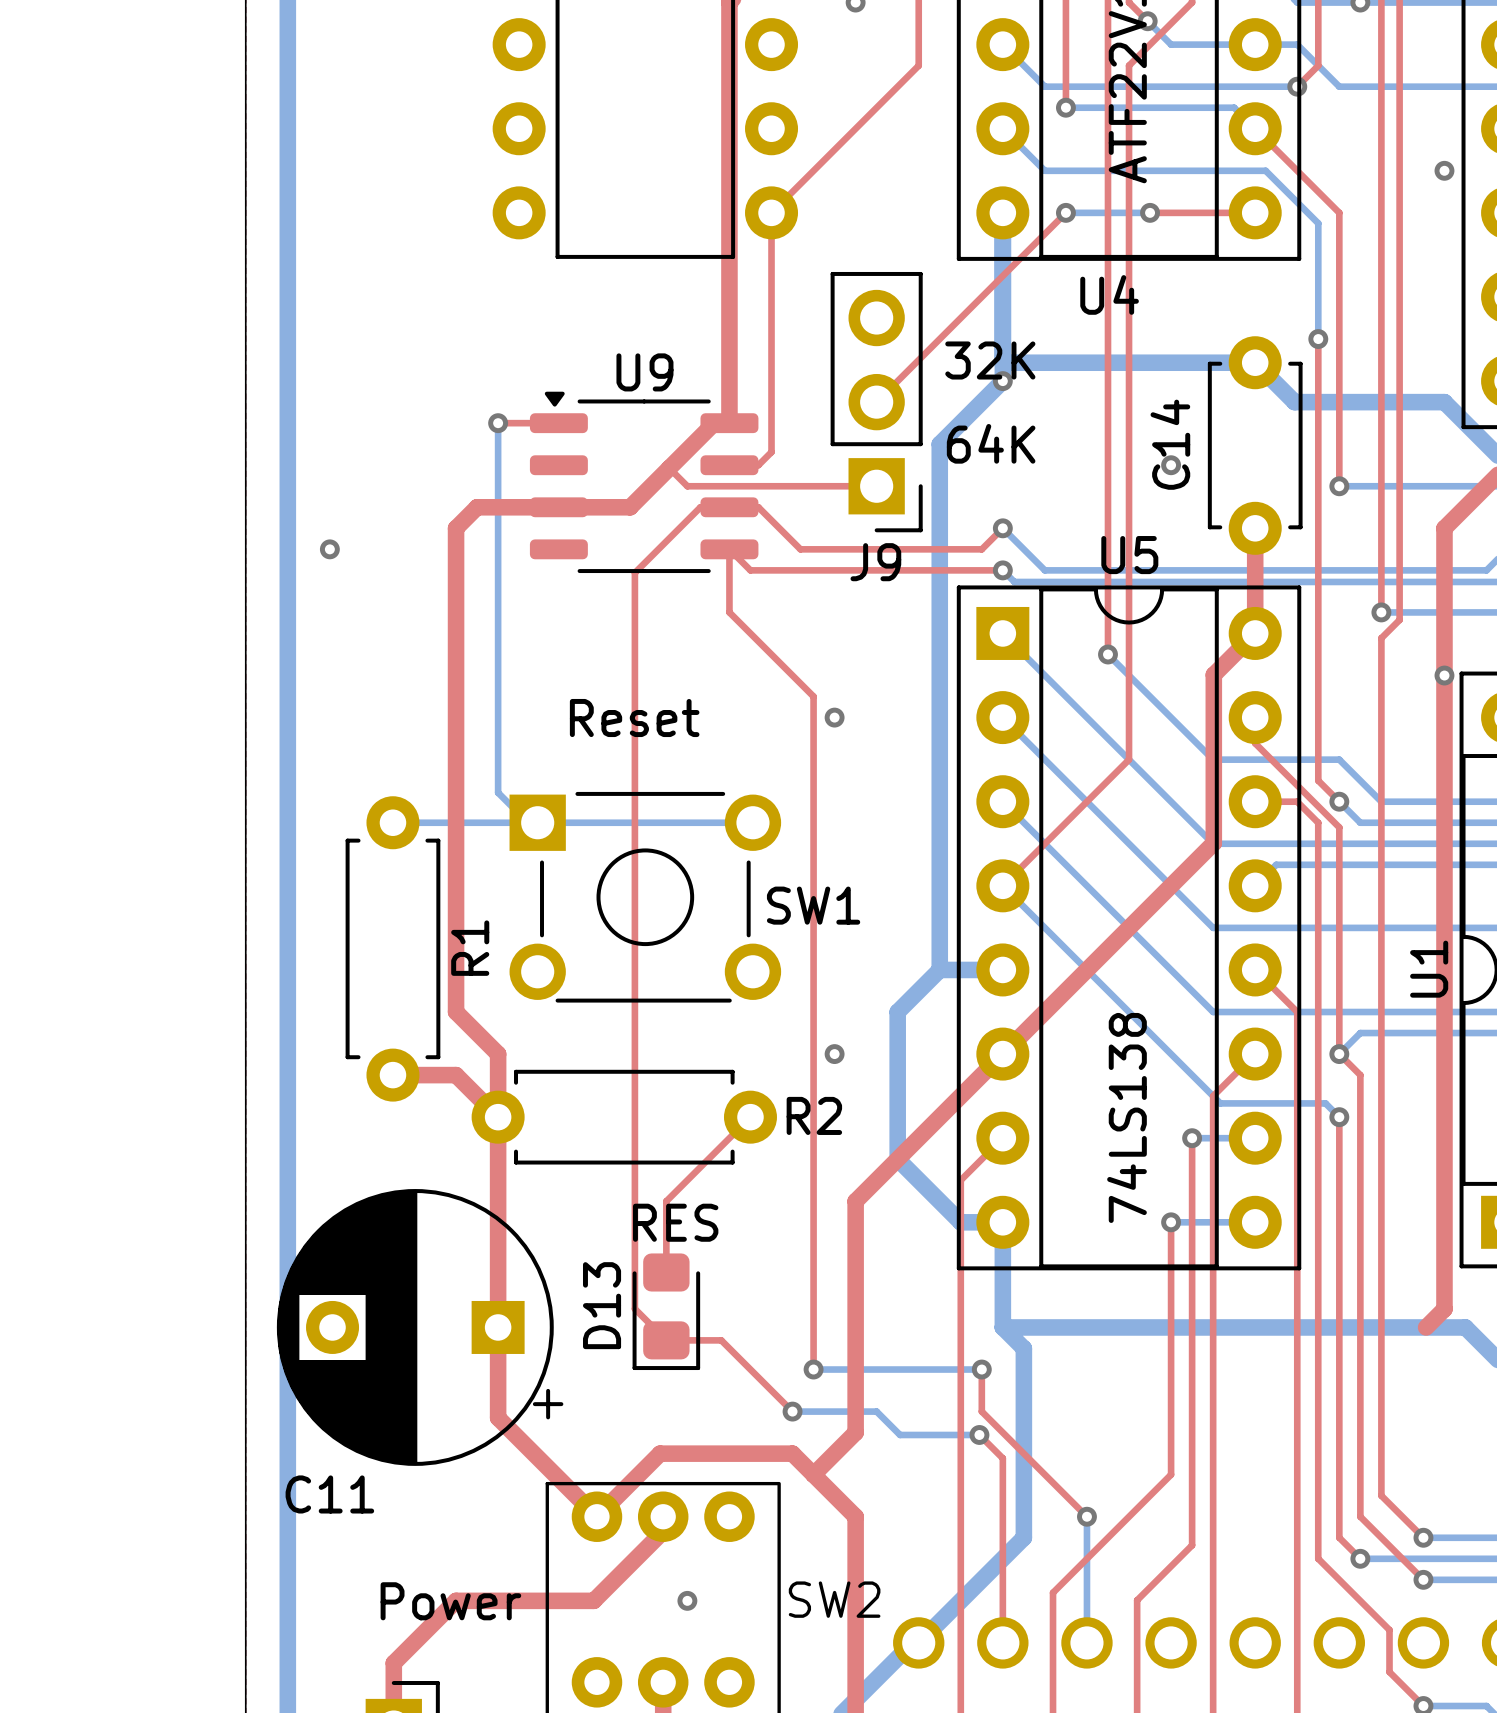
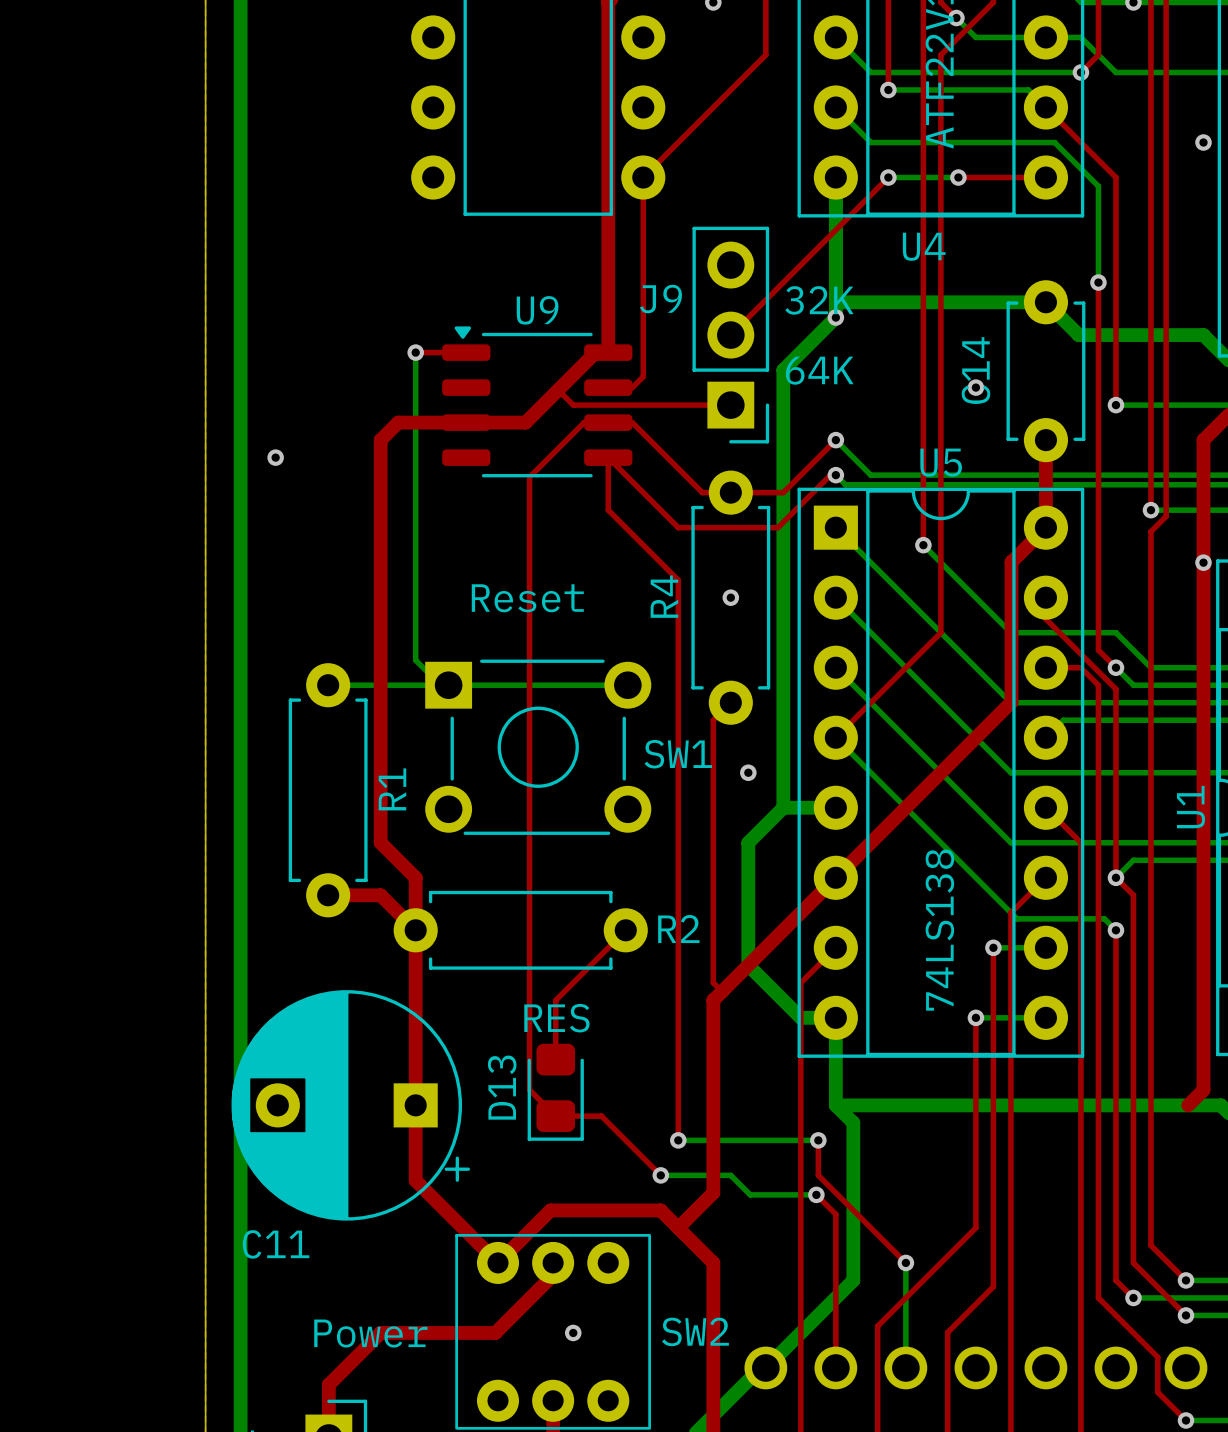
top track: (800, 549) (981, 549) -> (667, 457) (702, 492) (783, 492) (818, 457)
J9 name position: J9 (875, 562) -> J9 (660, 299)
top track: (750, 570) (996, 570) -> (625, 475) (678, 527) (777, 527) (830, 475)
via position: (834, 717) -> (730, 597)
R4: none -> (730, 597)
top track: none -> (730, 702) (713, 720) (713, 982) (722, 991)
via: none -> (748, 772)
via: (834, 1054) -> none

